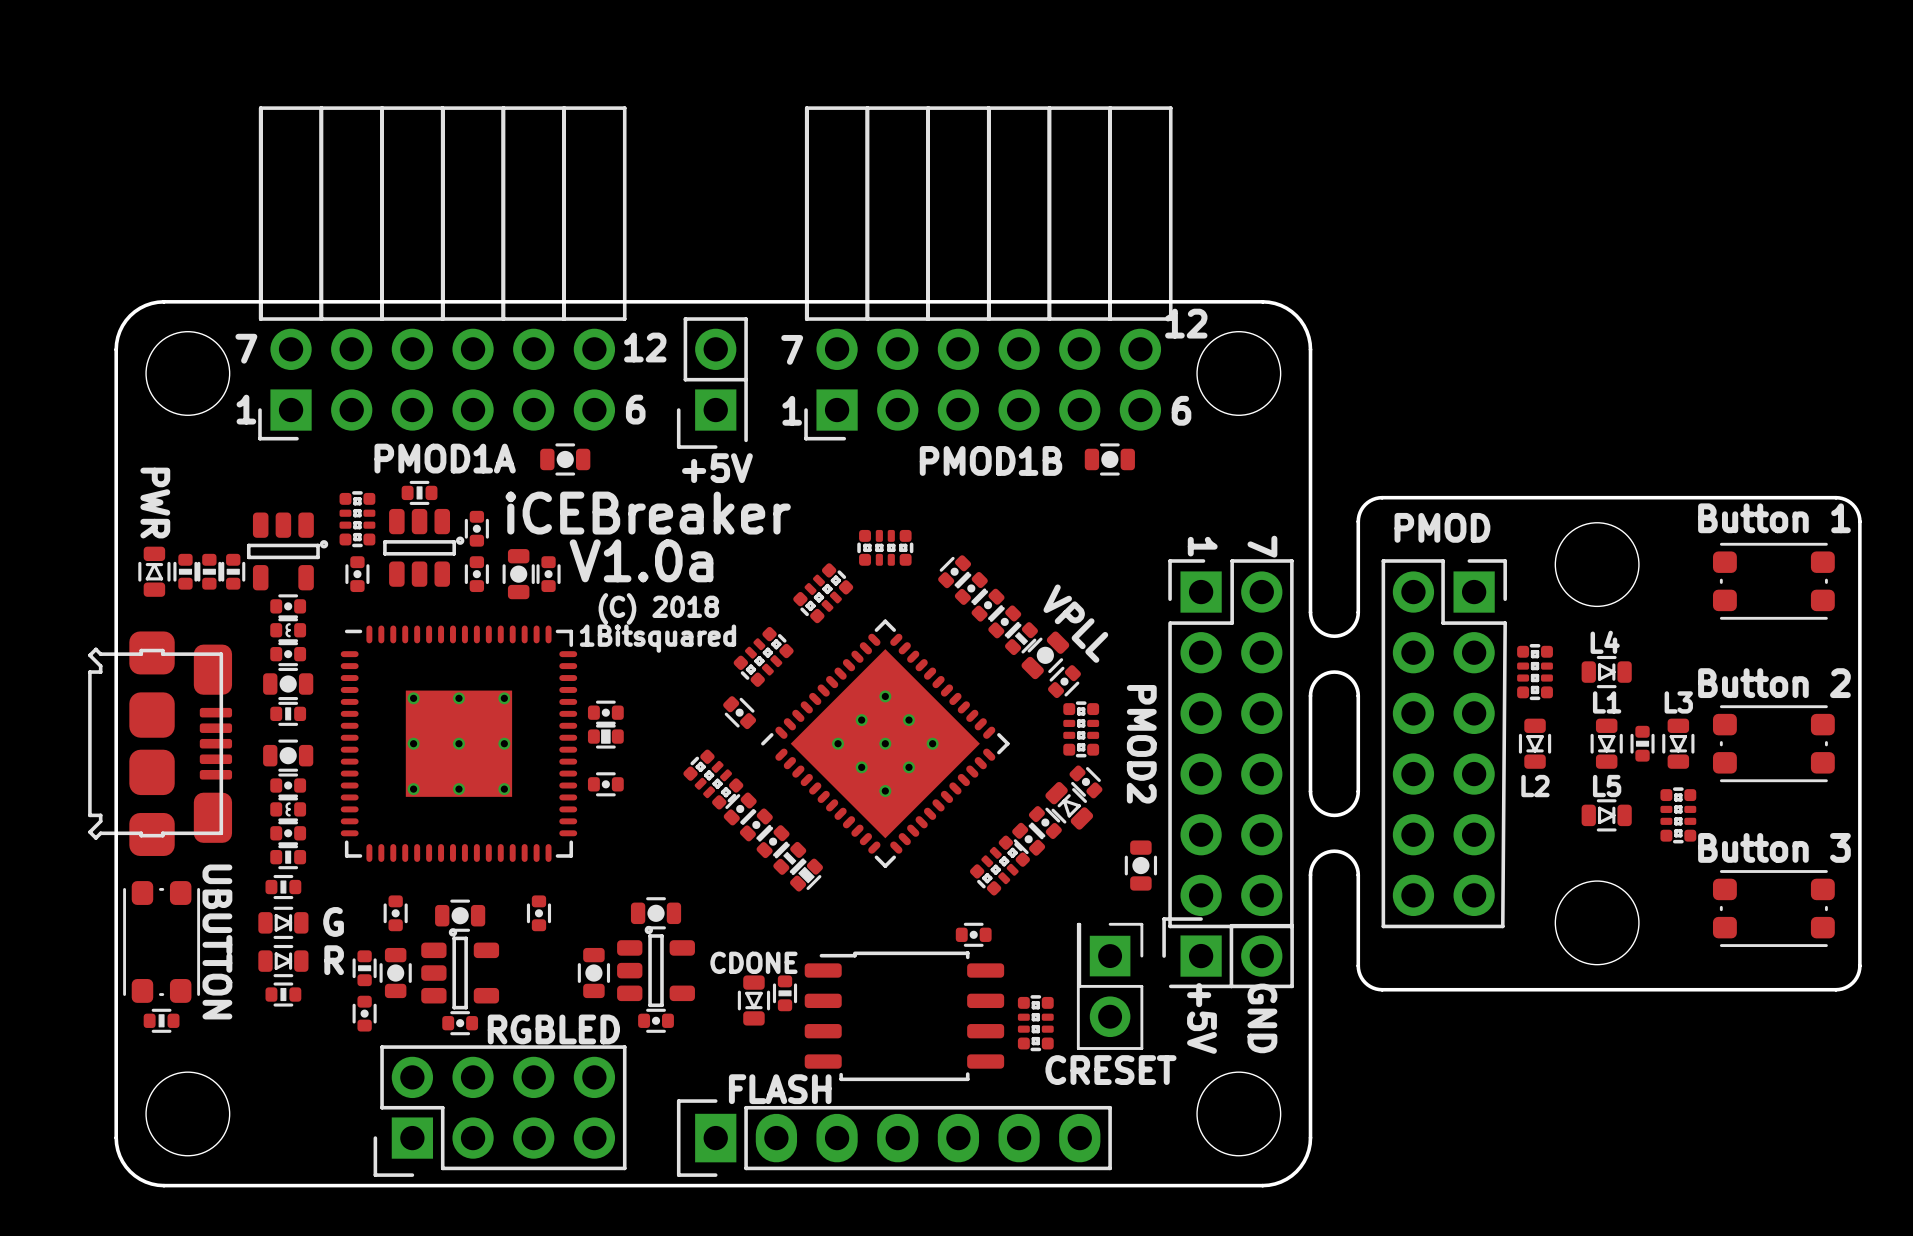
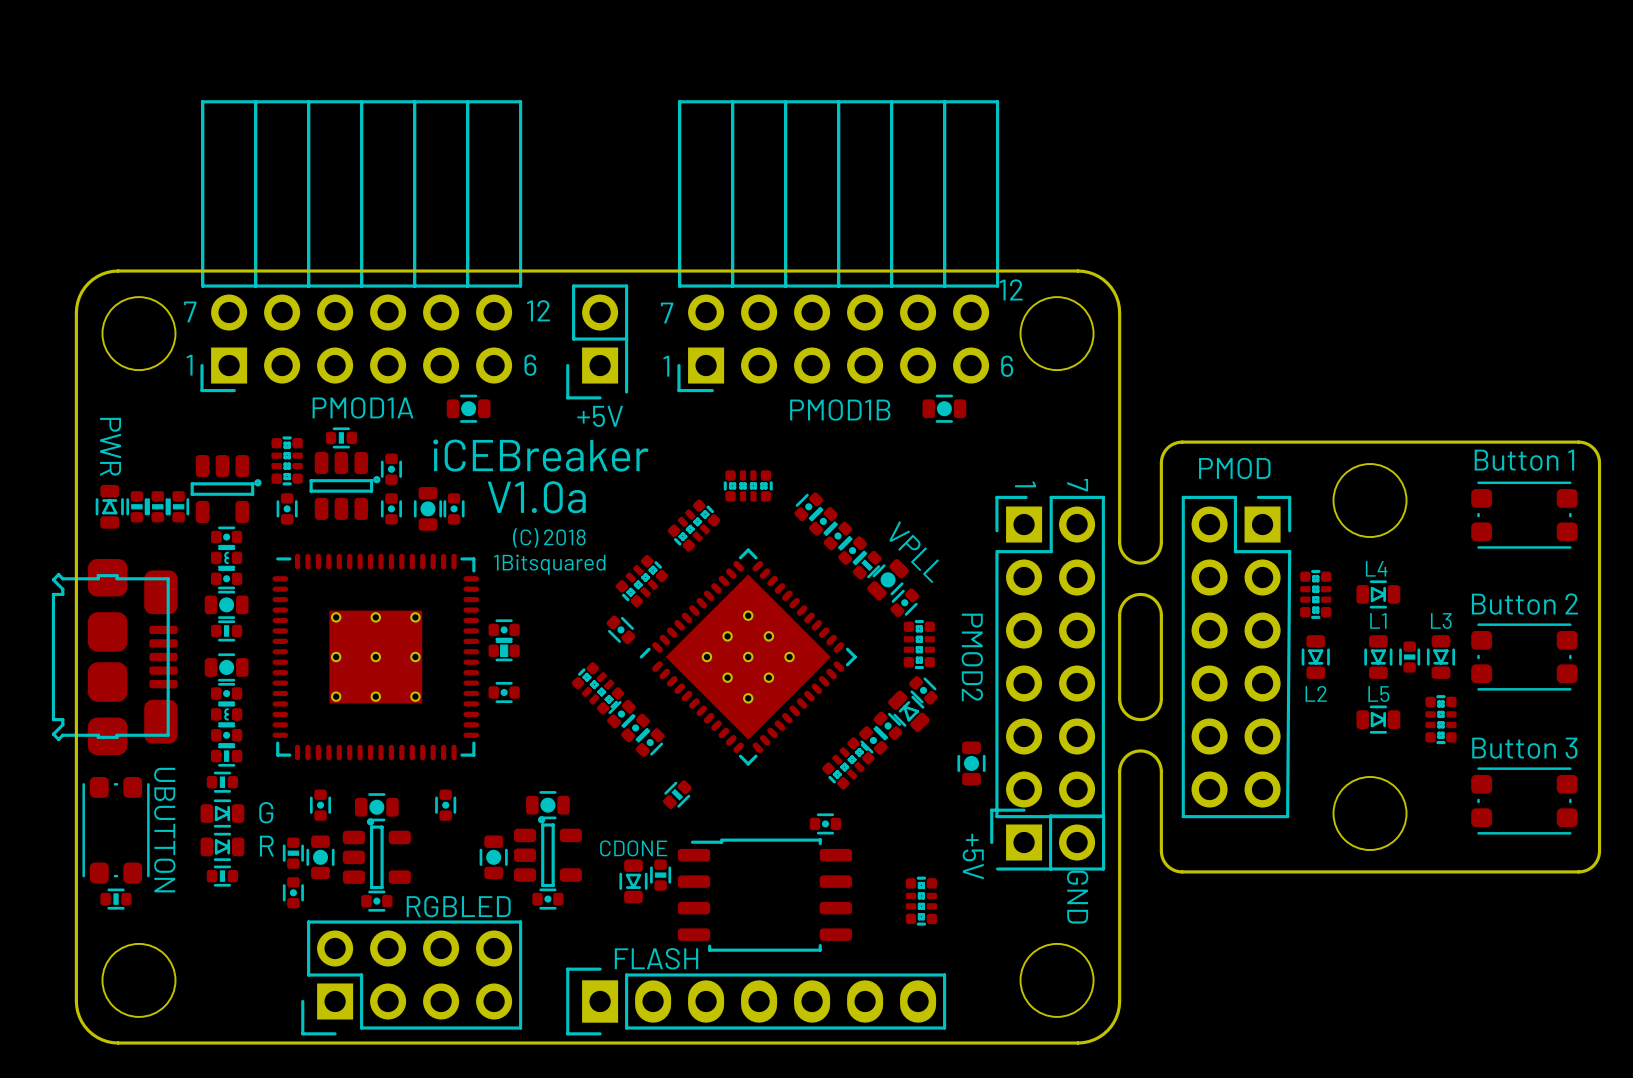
part position: (789, 858) -> (677, 794)
part: (806, 875) -> none
part: CRESET (1110, 986) -> none
text position: +5V (1201, 1018) -> +5V (973, 856)
part position: (1035, 1023) -> (921, 901)

